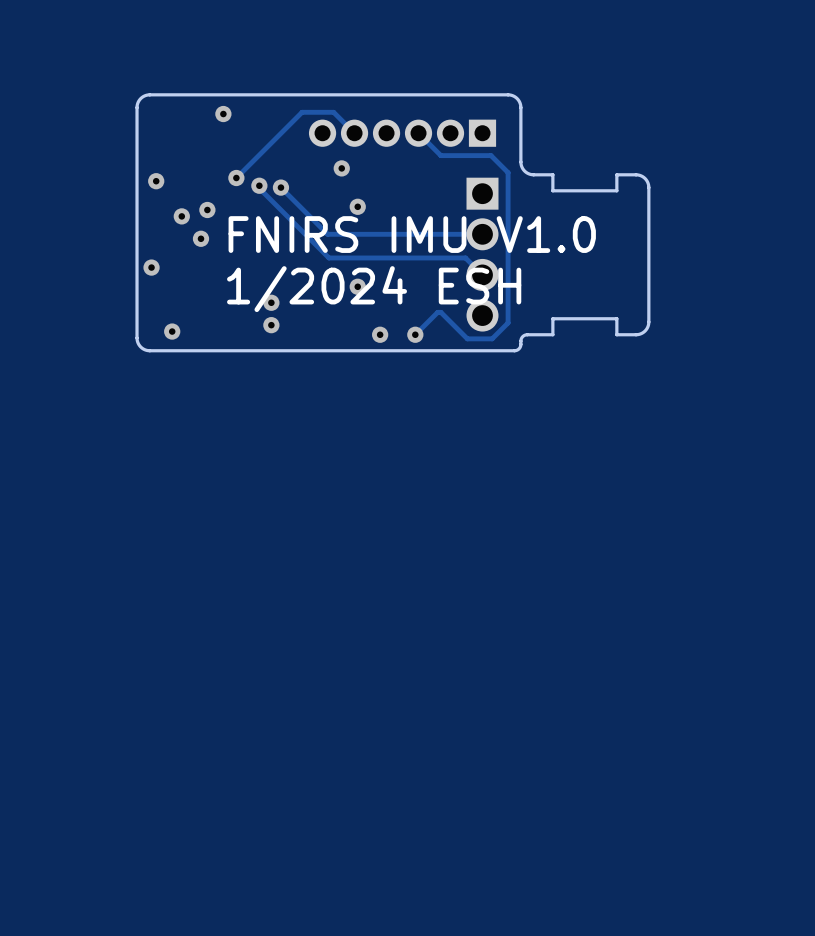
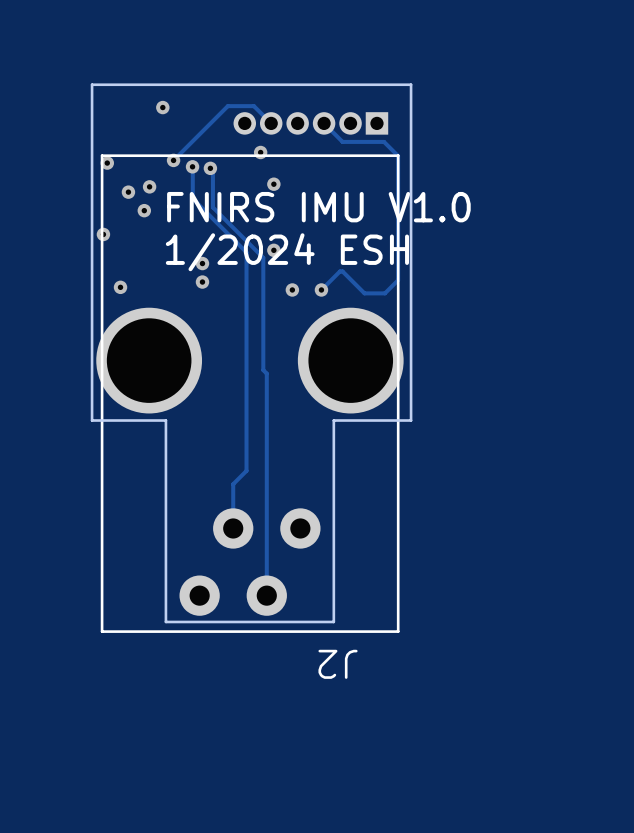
board edge: none -> (411, 84) (92, 84) (92, 420) (165, 420) (165, 621) (333, 621) (333, 420) (411, 420) (411, 84)
board edge: (508, 94) (149, 94) (143, 96) (138, 100) (137, 107) (137, 337) (138, 344) (143, 348) (149, 350) (514, 350) (520, 347) (521, 338) (524, 335) (552, 334) (552, 318) (616, 318) (616, 334) (642, 332) (646, 328) (648, 321) (648, 187) (646, 180) (638, 175) (616, 174) (616, 190) (552, 190) (552, 174) (530, 174) (522, 167) (520, 104) (516, 97) (508, 94) -> none
track: none -> (192, 161) (192, 198) (246, 252) (246, 470) (233, 484) (233, 528)
track: none -> (212, 165) (212, 207) (263, 257) (263, 370) (266, 373) (266, 595)
track: (259, 185) (259, 188) (328, 257) (465, 257) (482, 274) -> none
track: (280, 187) (327, 234) (482, 234) -> none
part: (482, 254) -> none
J2: none -> (249, 393)

